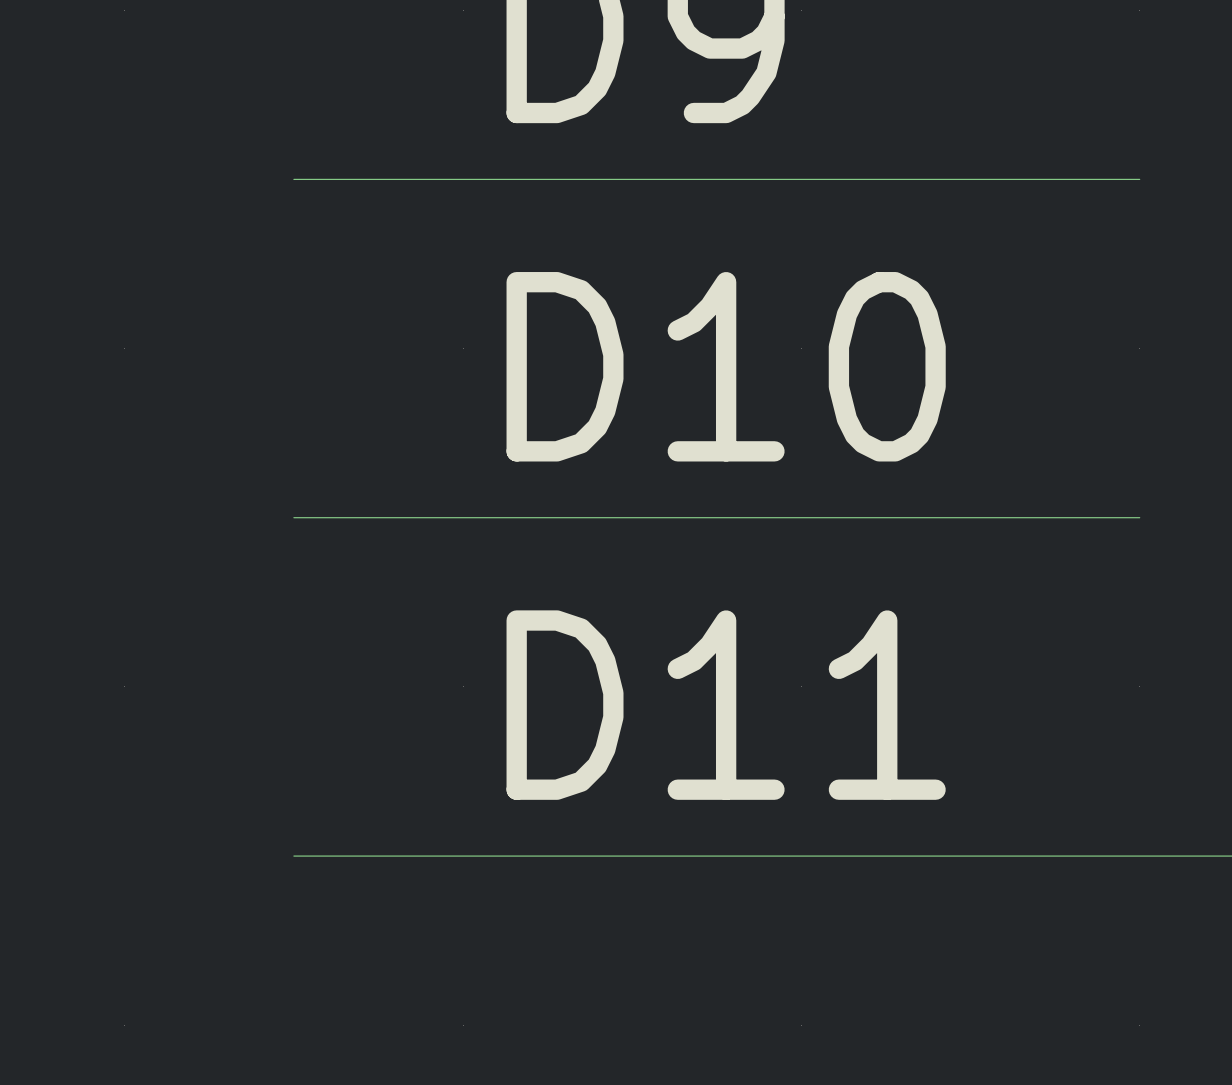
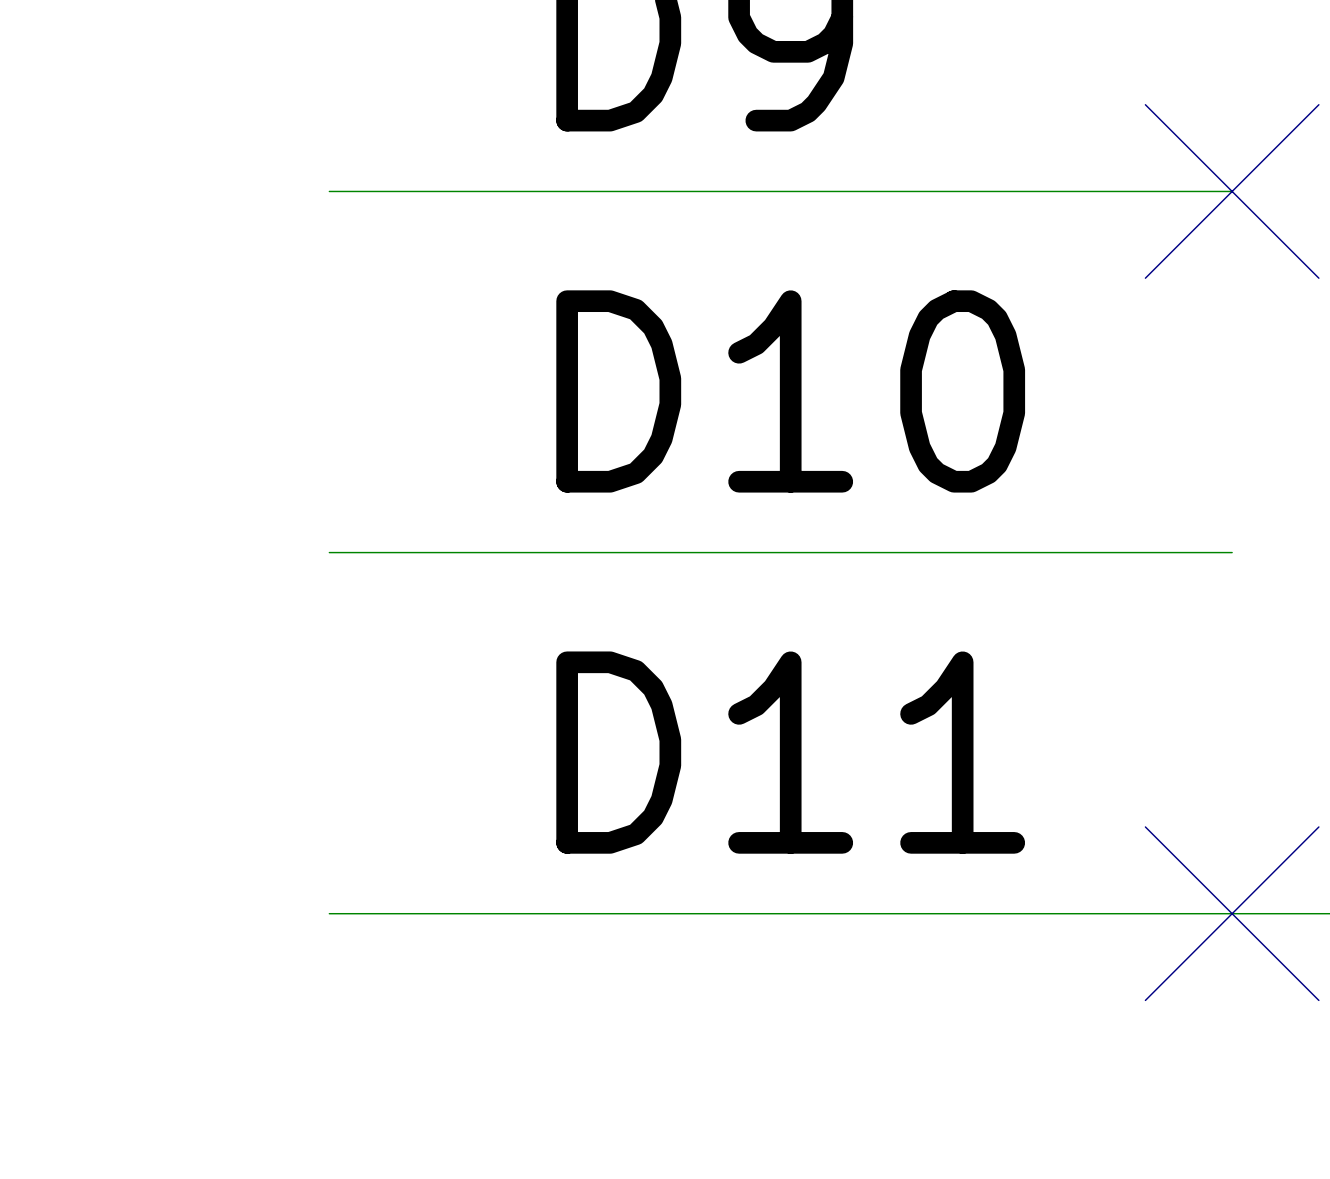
no-connect mark: none -> (1232, 191)
no-connect mark: none -> (1232, 913)

